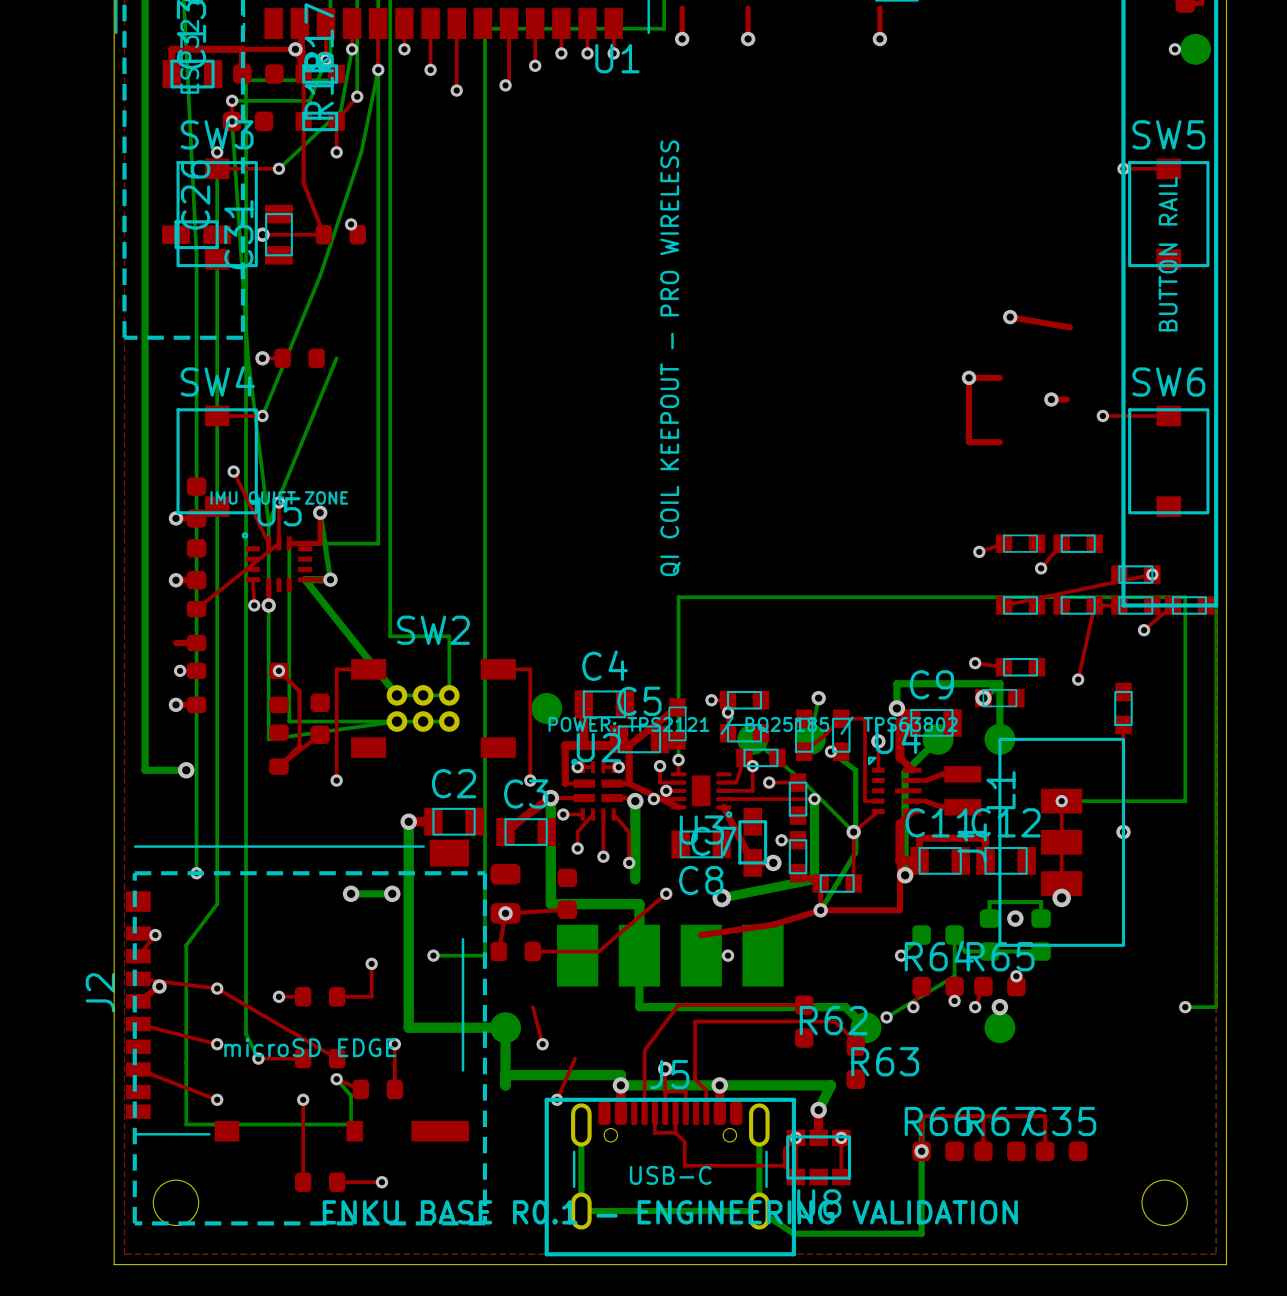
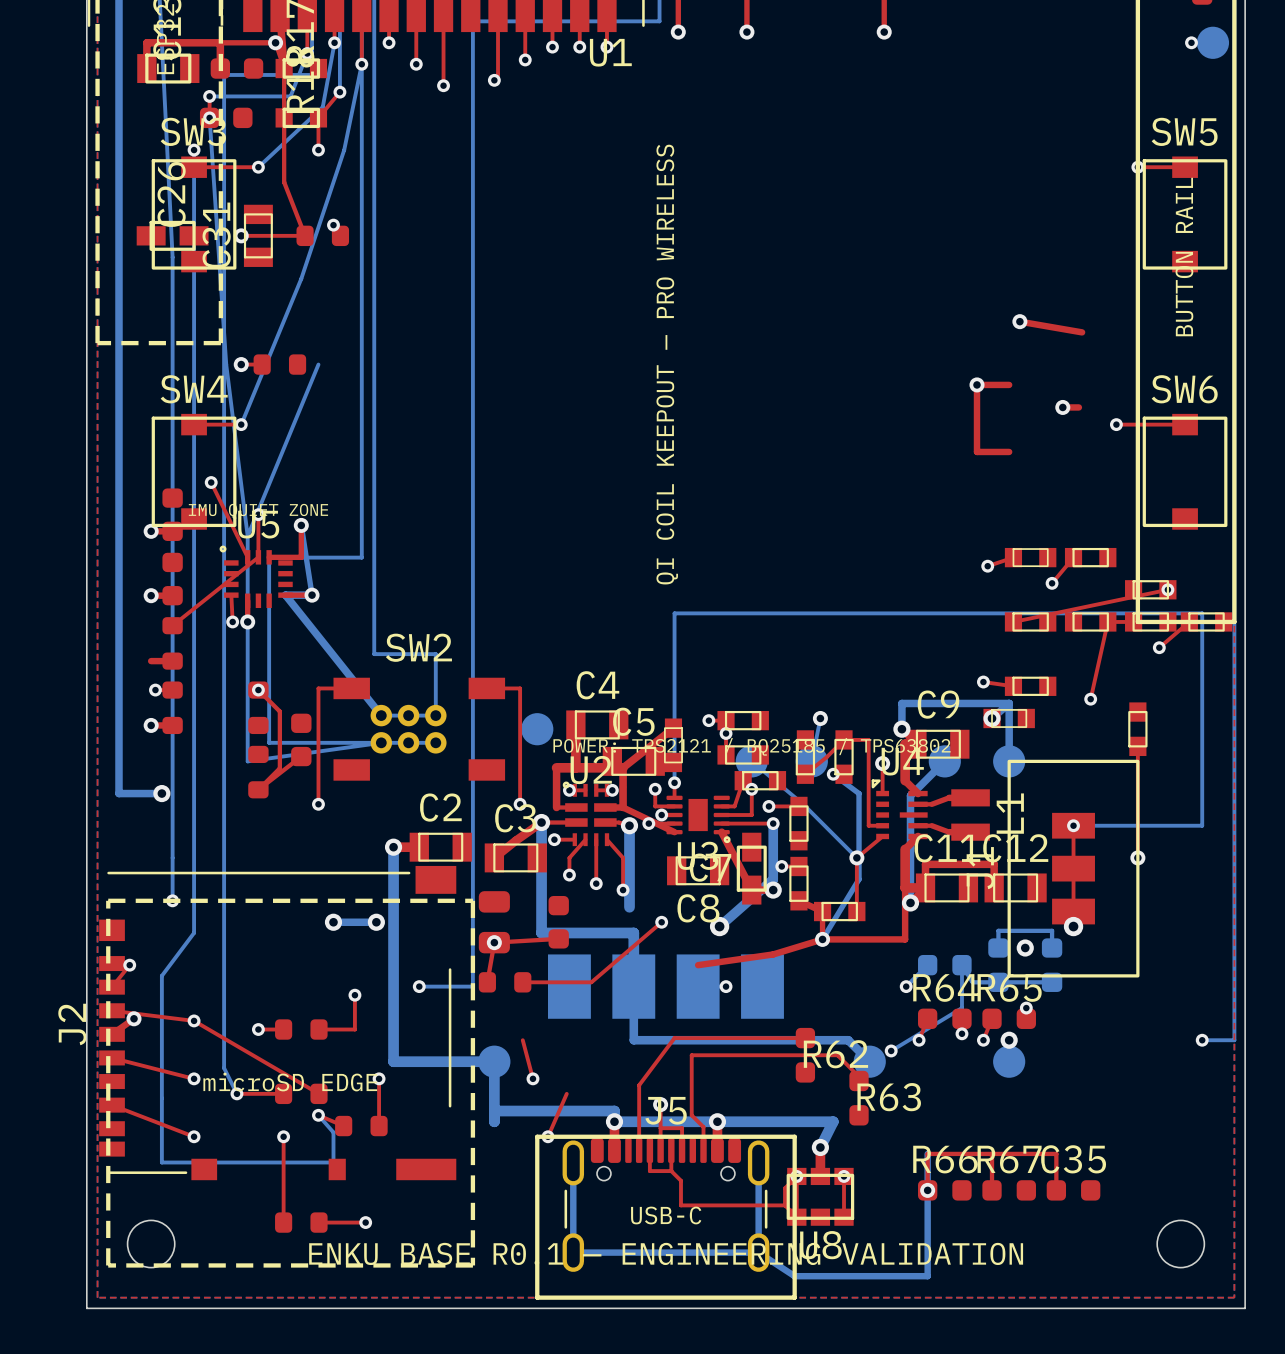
top track: (773, 799) (814, 799) -> none
bottom track: (814, 799) (814, 879) (721, 897) -> (773, 823) (773, 879) (719, 926)
via position: (814, 799) -> (773, 823)

